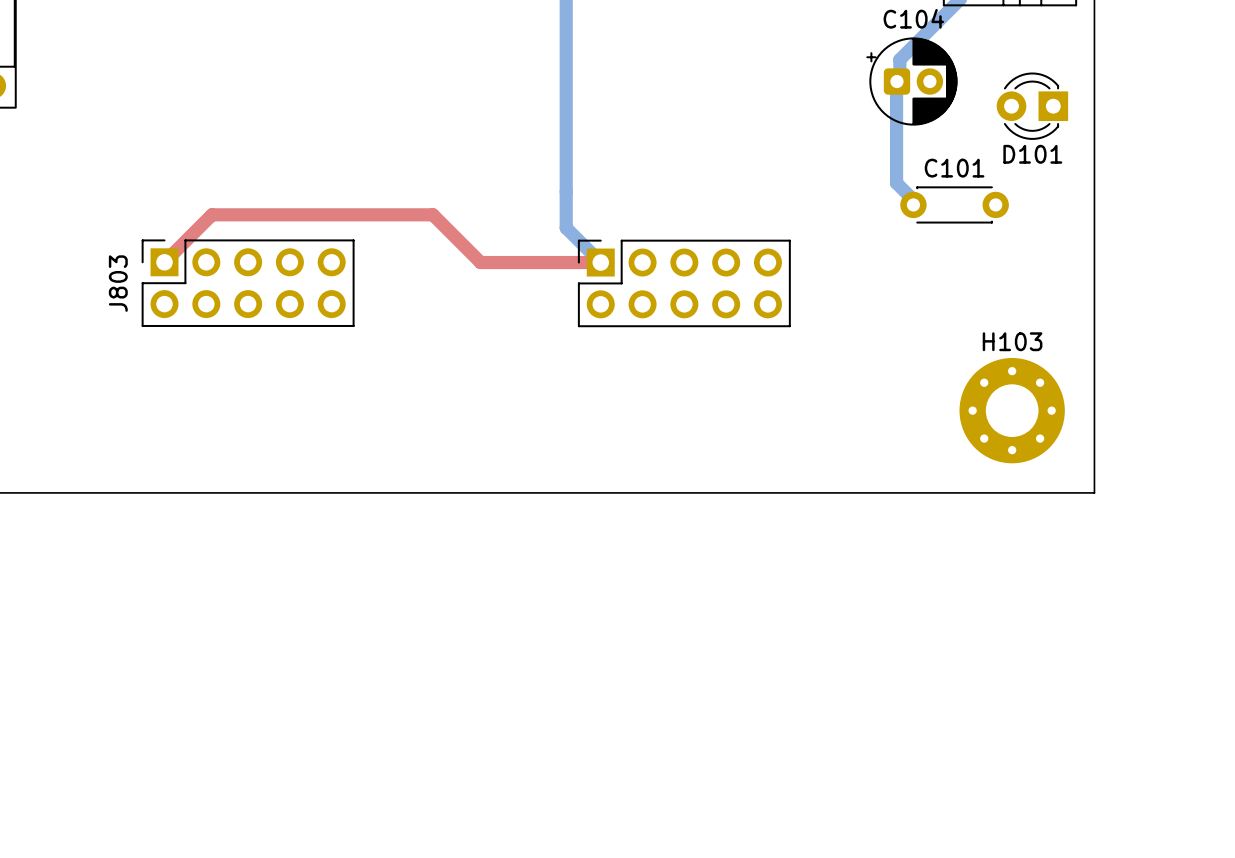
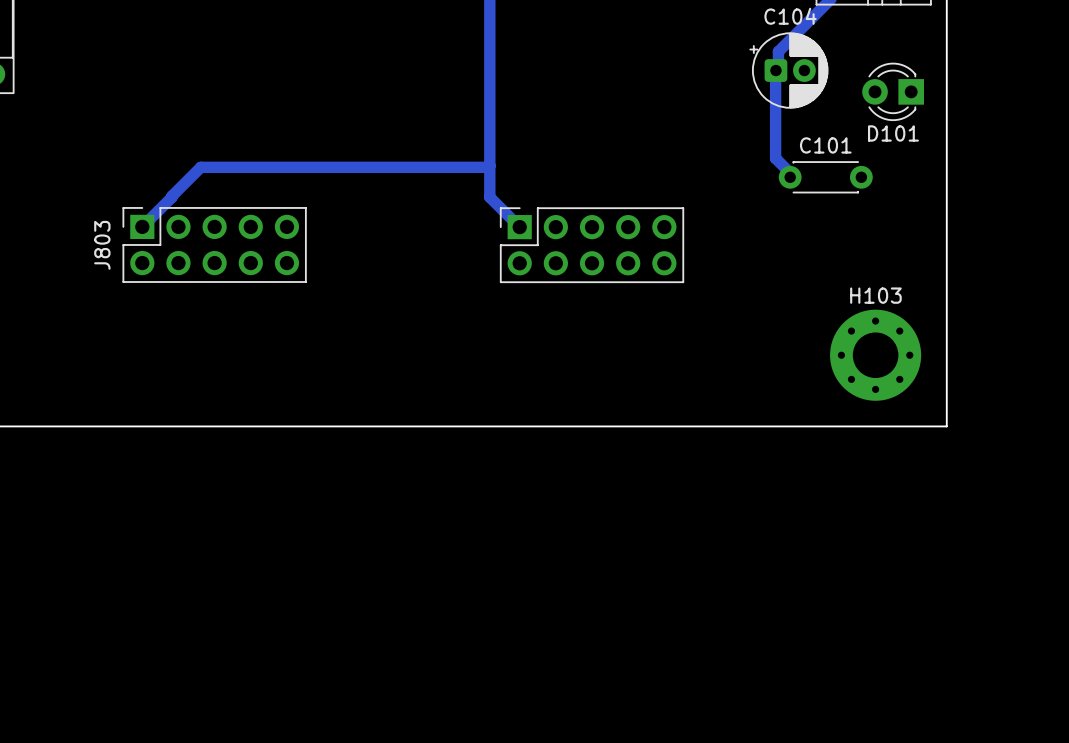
bottom track: none -> (489, 165) (200, 167) (142, 226)
top track: (164, 262) (211, 214) (432, 214) (480, 262) (600, 262) -> none

